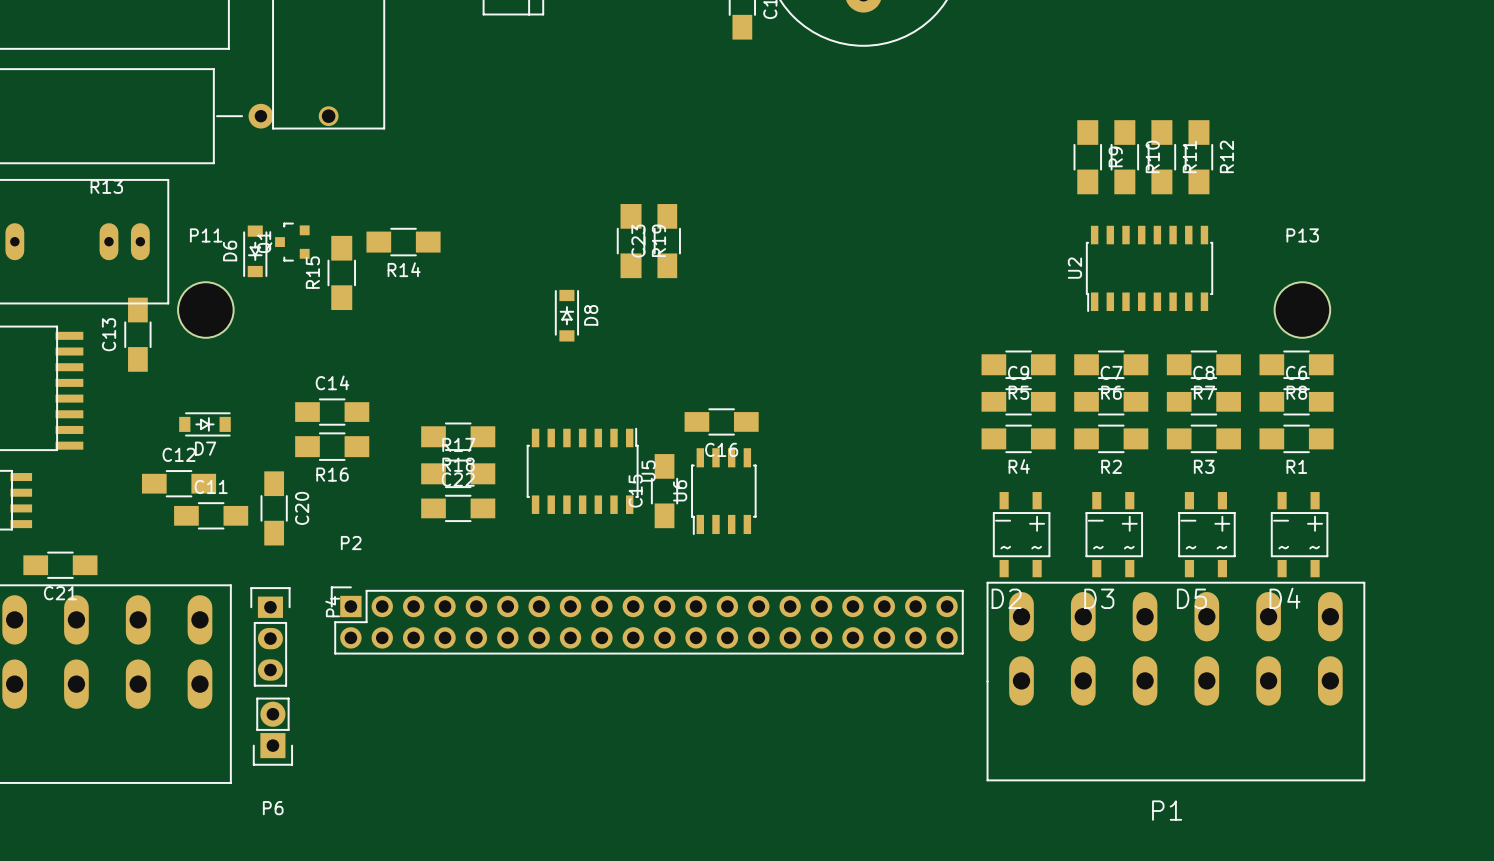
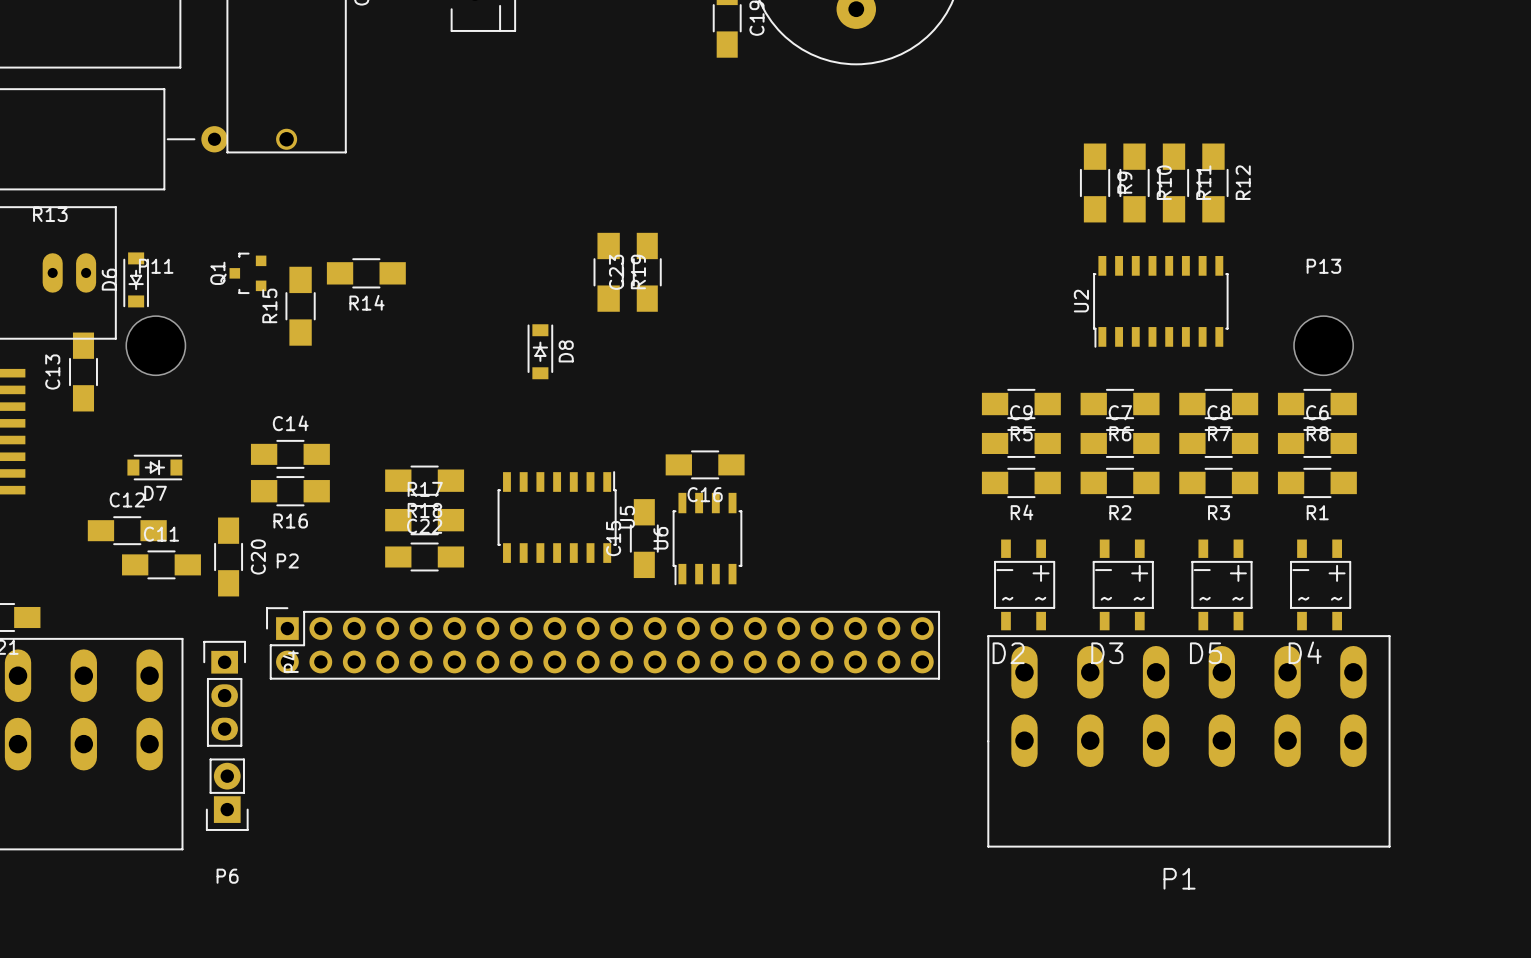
D6 position: (255, 251) -> (136, 279)
P2 position: (647, 620) -> (603, 643)

